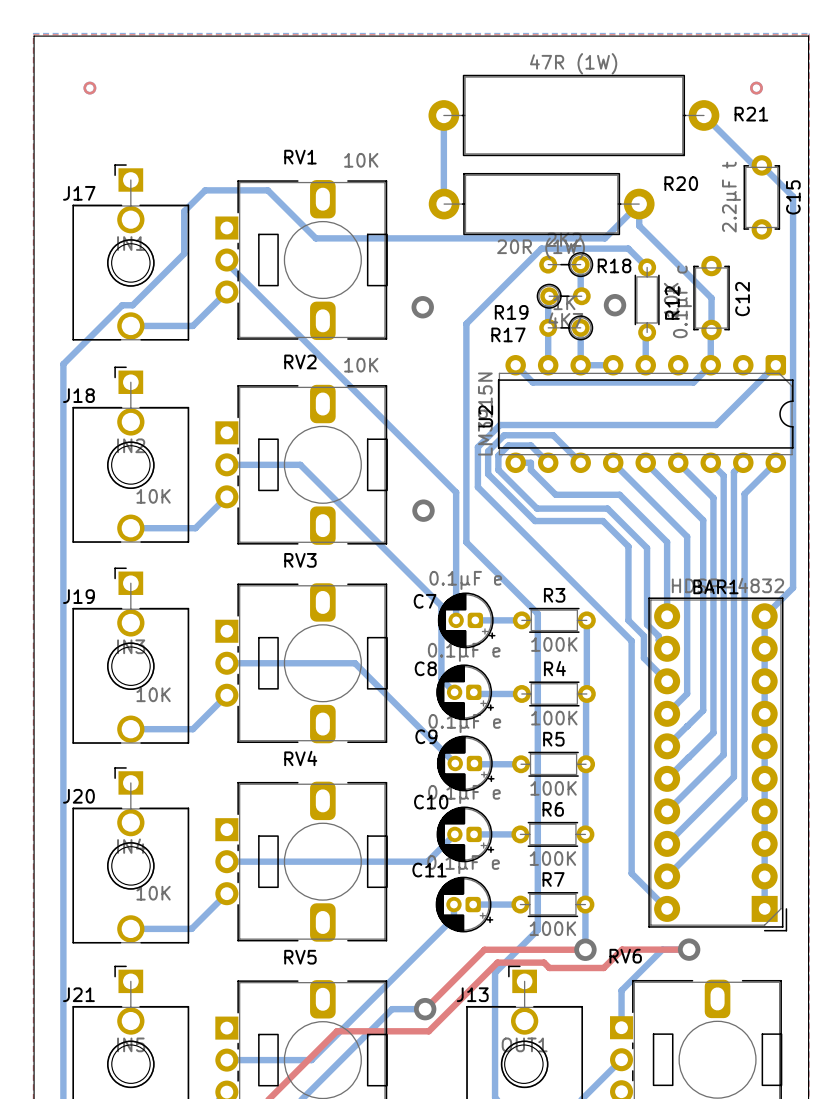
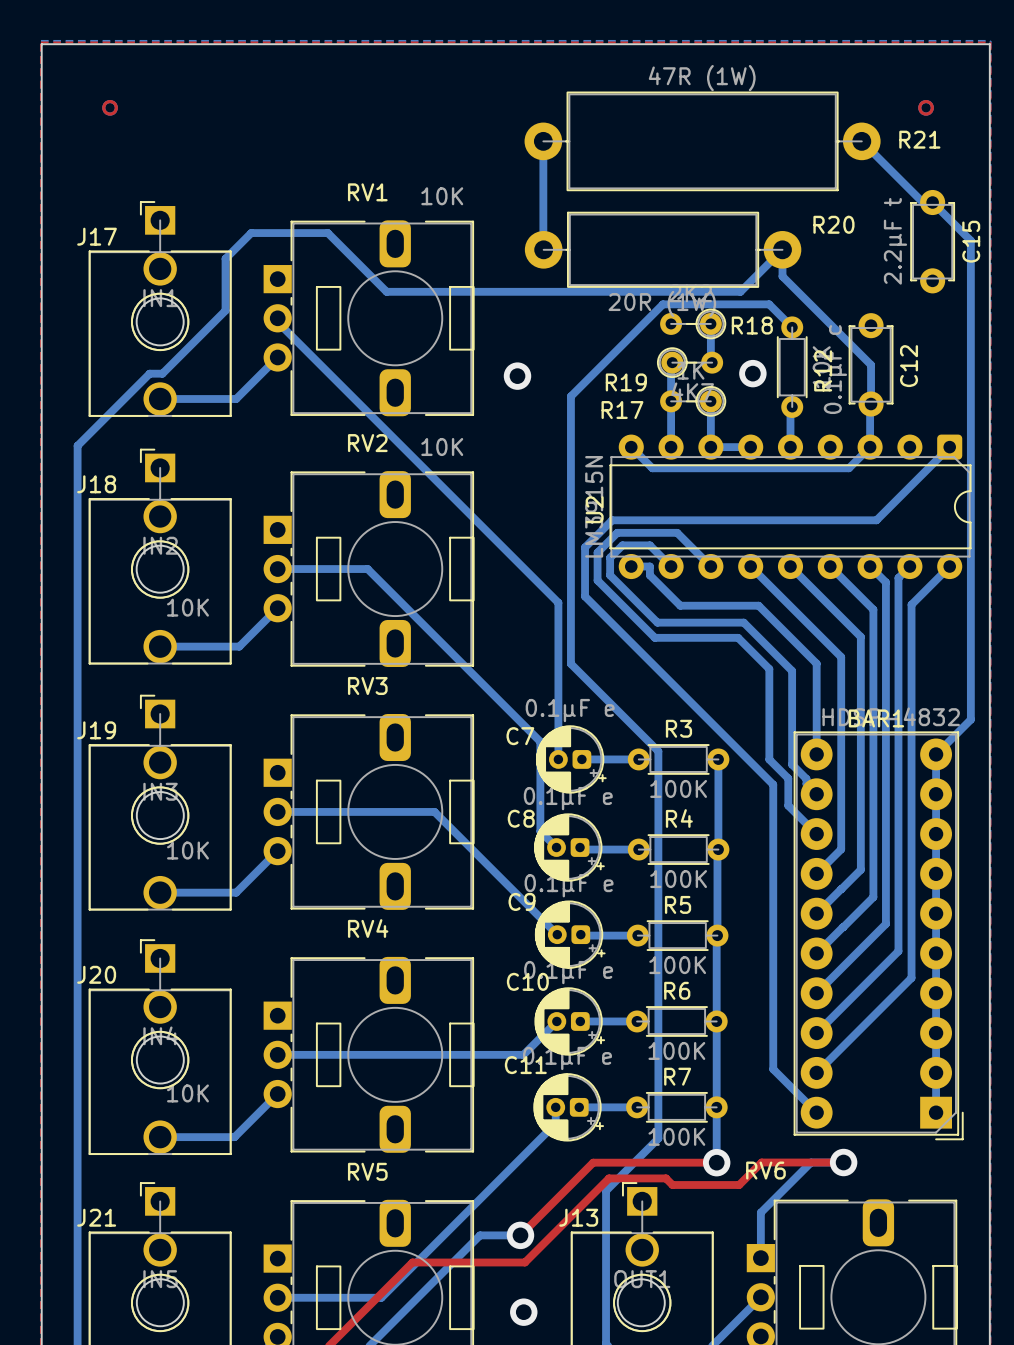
via: (423, 510) -> none
via: none -> (523, 1312)

